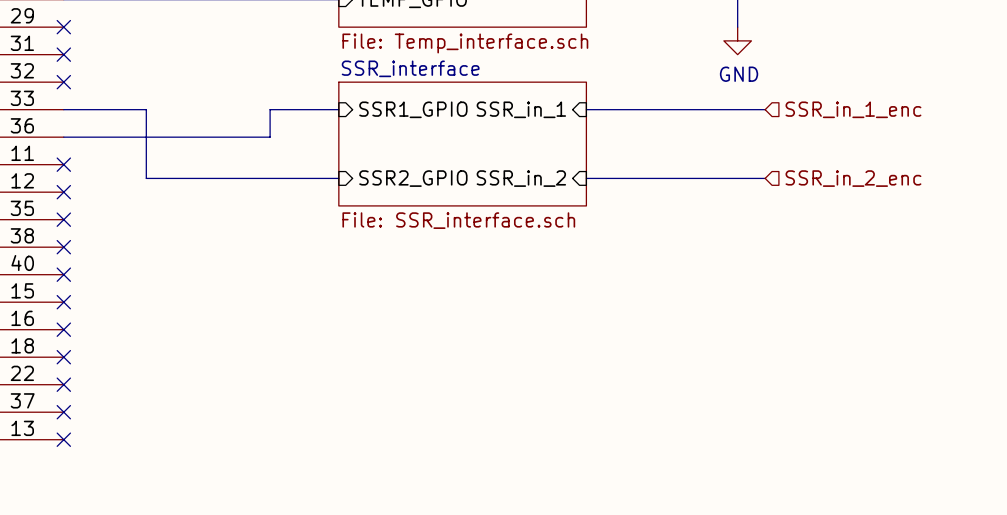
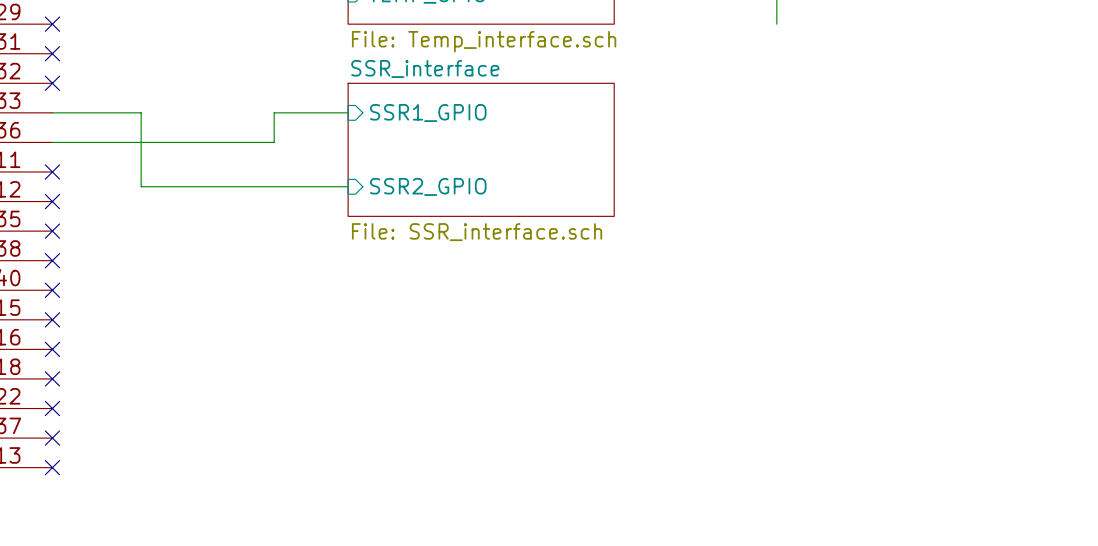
power symbol: GND (737, 40) -> none
sheet pin: SSR_in_1 (521, 109) -> none
wire: (586, 109) (765, 109) -> none
hierarchical label: SSR_in_1_enc (853, 109) -> none
sheet pin: SSR_in_2 (521, 178) -> none
wire: (586, 178) (765, 178) -> none
hierarchical label: SSR_in_2_enc (853, 178) -> none

